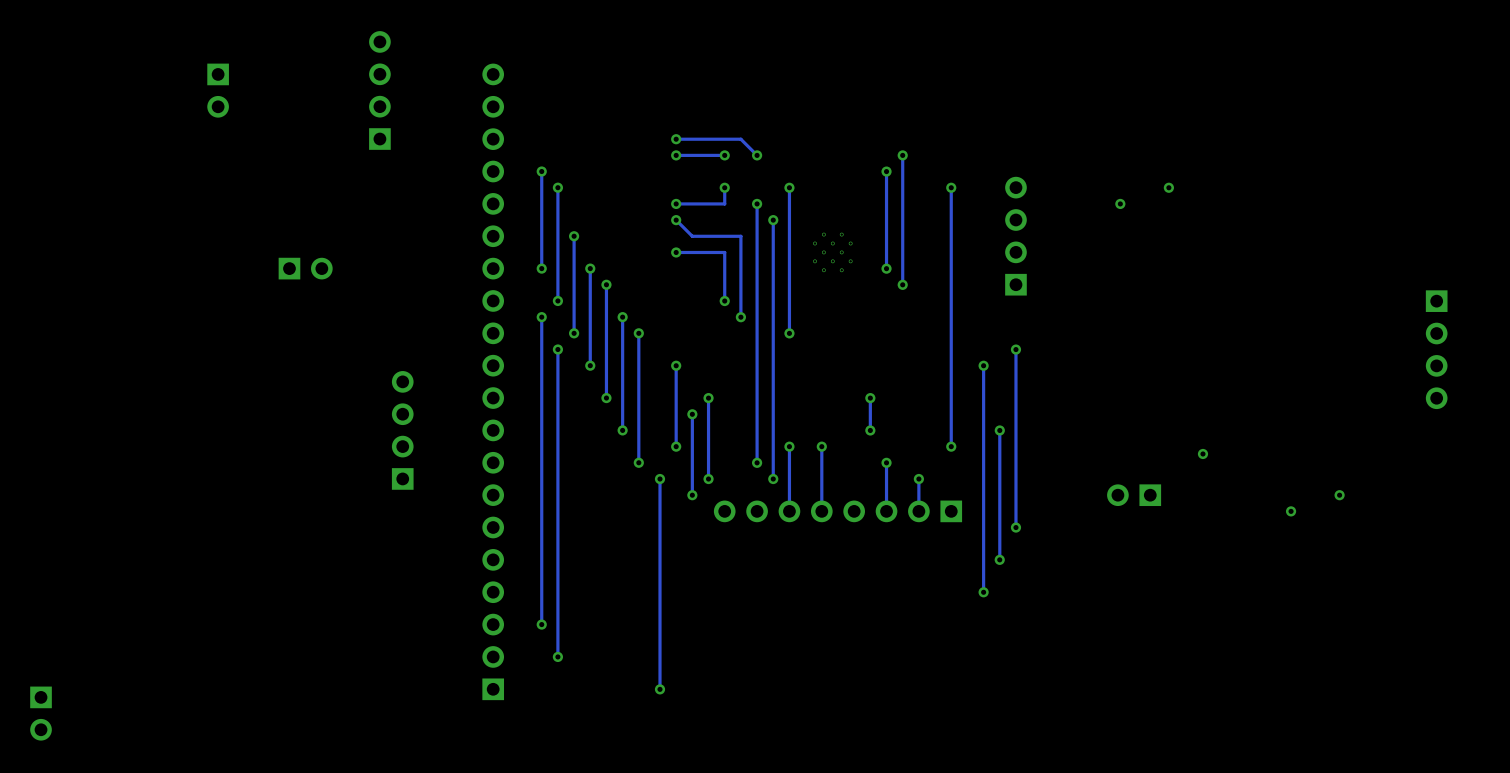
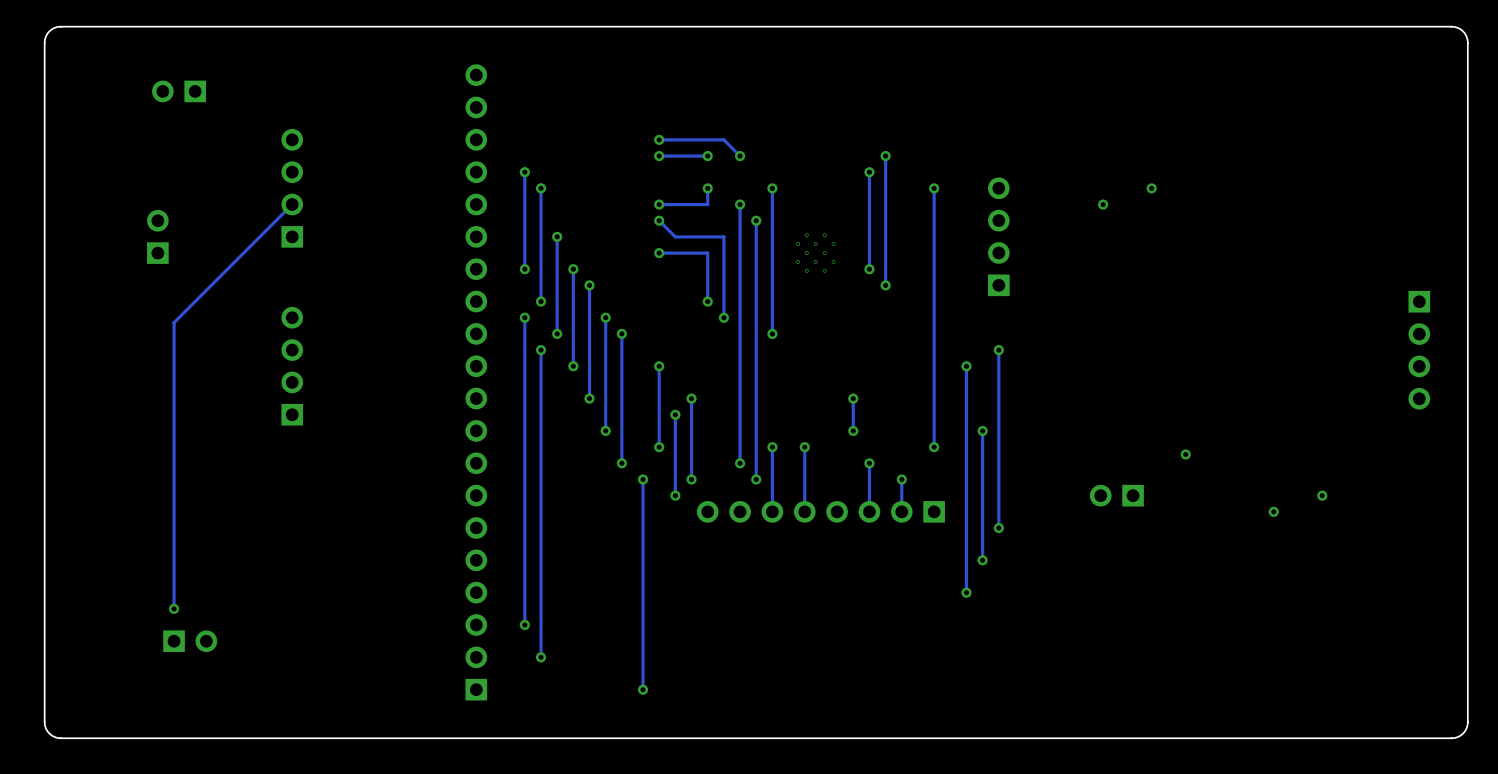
board edge: none -> (1451, 26) (60, 26) (53, 28) (47, 34) (44, 42) (44, 722) (46, 729) (52, 735) (60, 738) (1451, 738) (1458, 736) (1465, 730) (1467, 722) (1467, 42) (1463, 31) (1451, 26)
part rotation: 0° (218, 90) -> 90° clockwise (179, 91)
part position: (379, 90) -> (292, 188)
track: none -> (292, 204) (174, 322) (174, 608)
part: none -> (157, 236)
part: (305, 268) -> none
part position: (402, 430) -> (292, 366)
via: none -> (174, 608)
part rotation: 0° (41, 713) -> 90° counterclockwise (190, 641)
part position: (41, 713) -> (190, 641)

